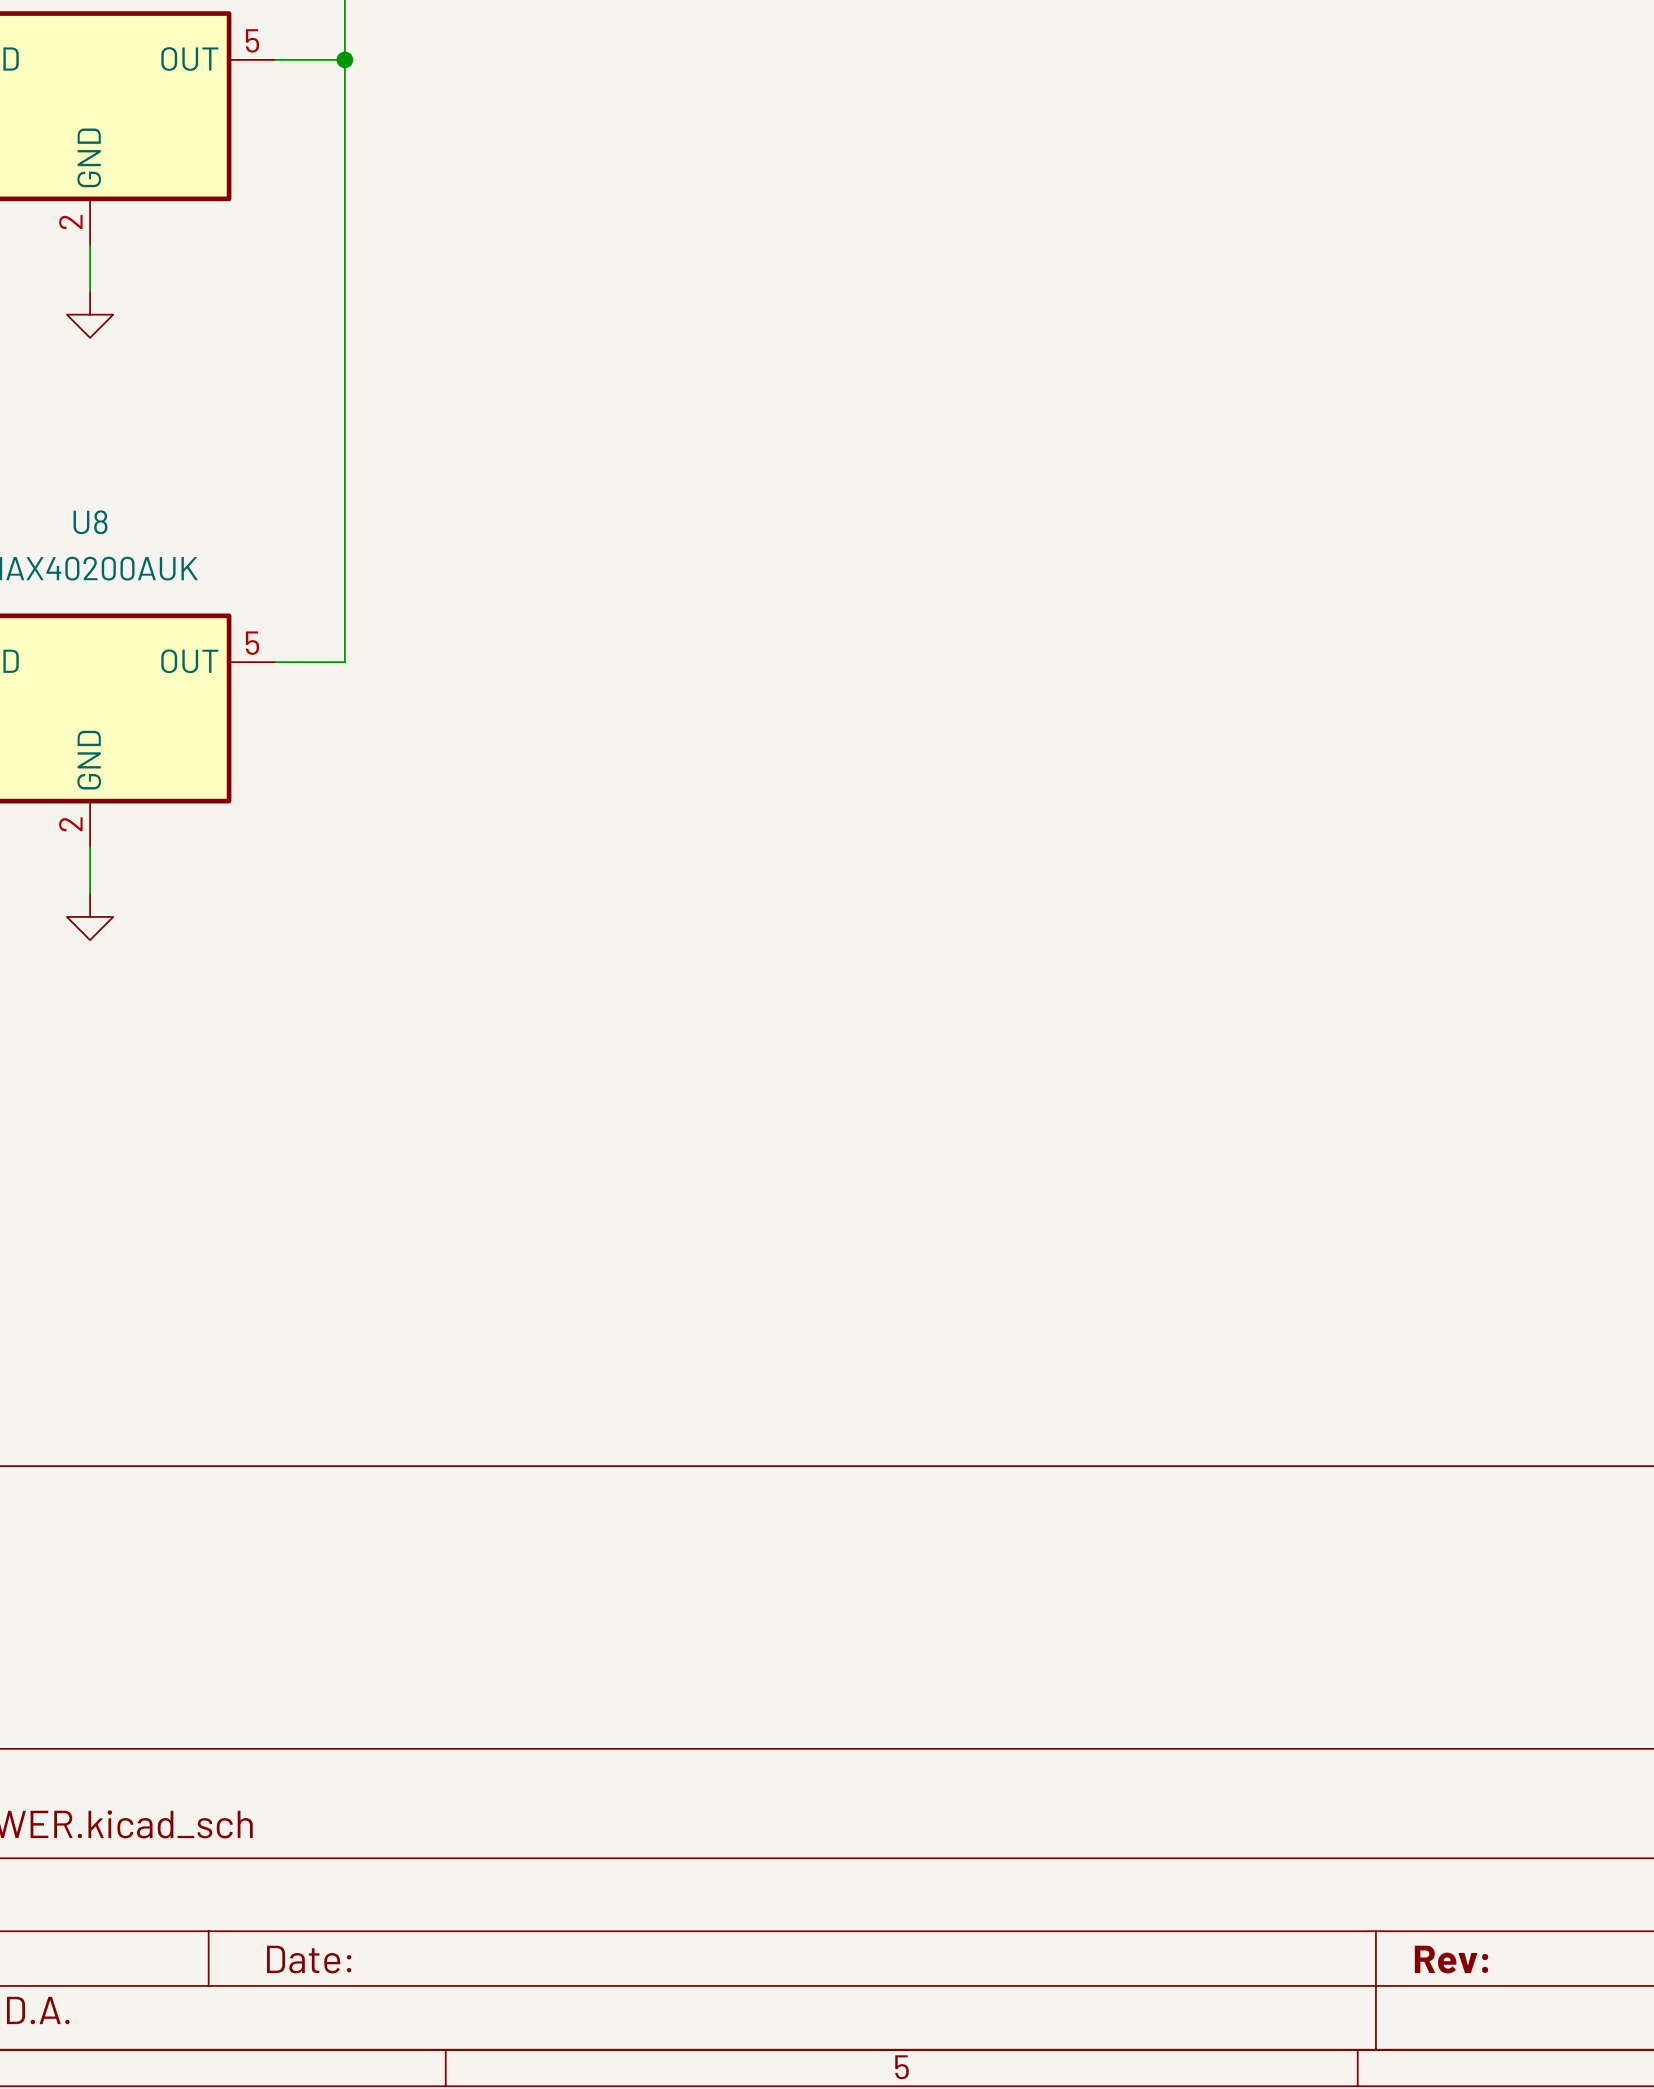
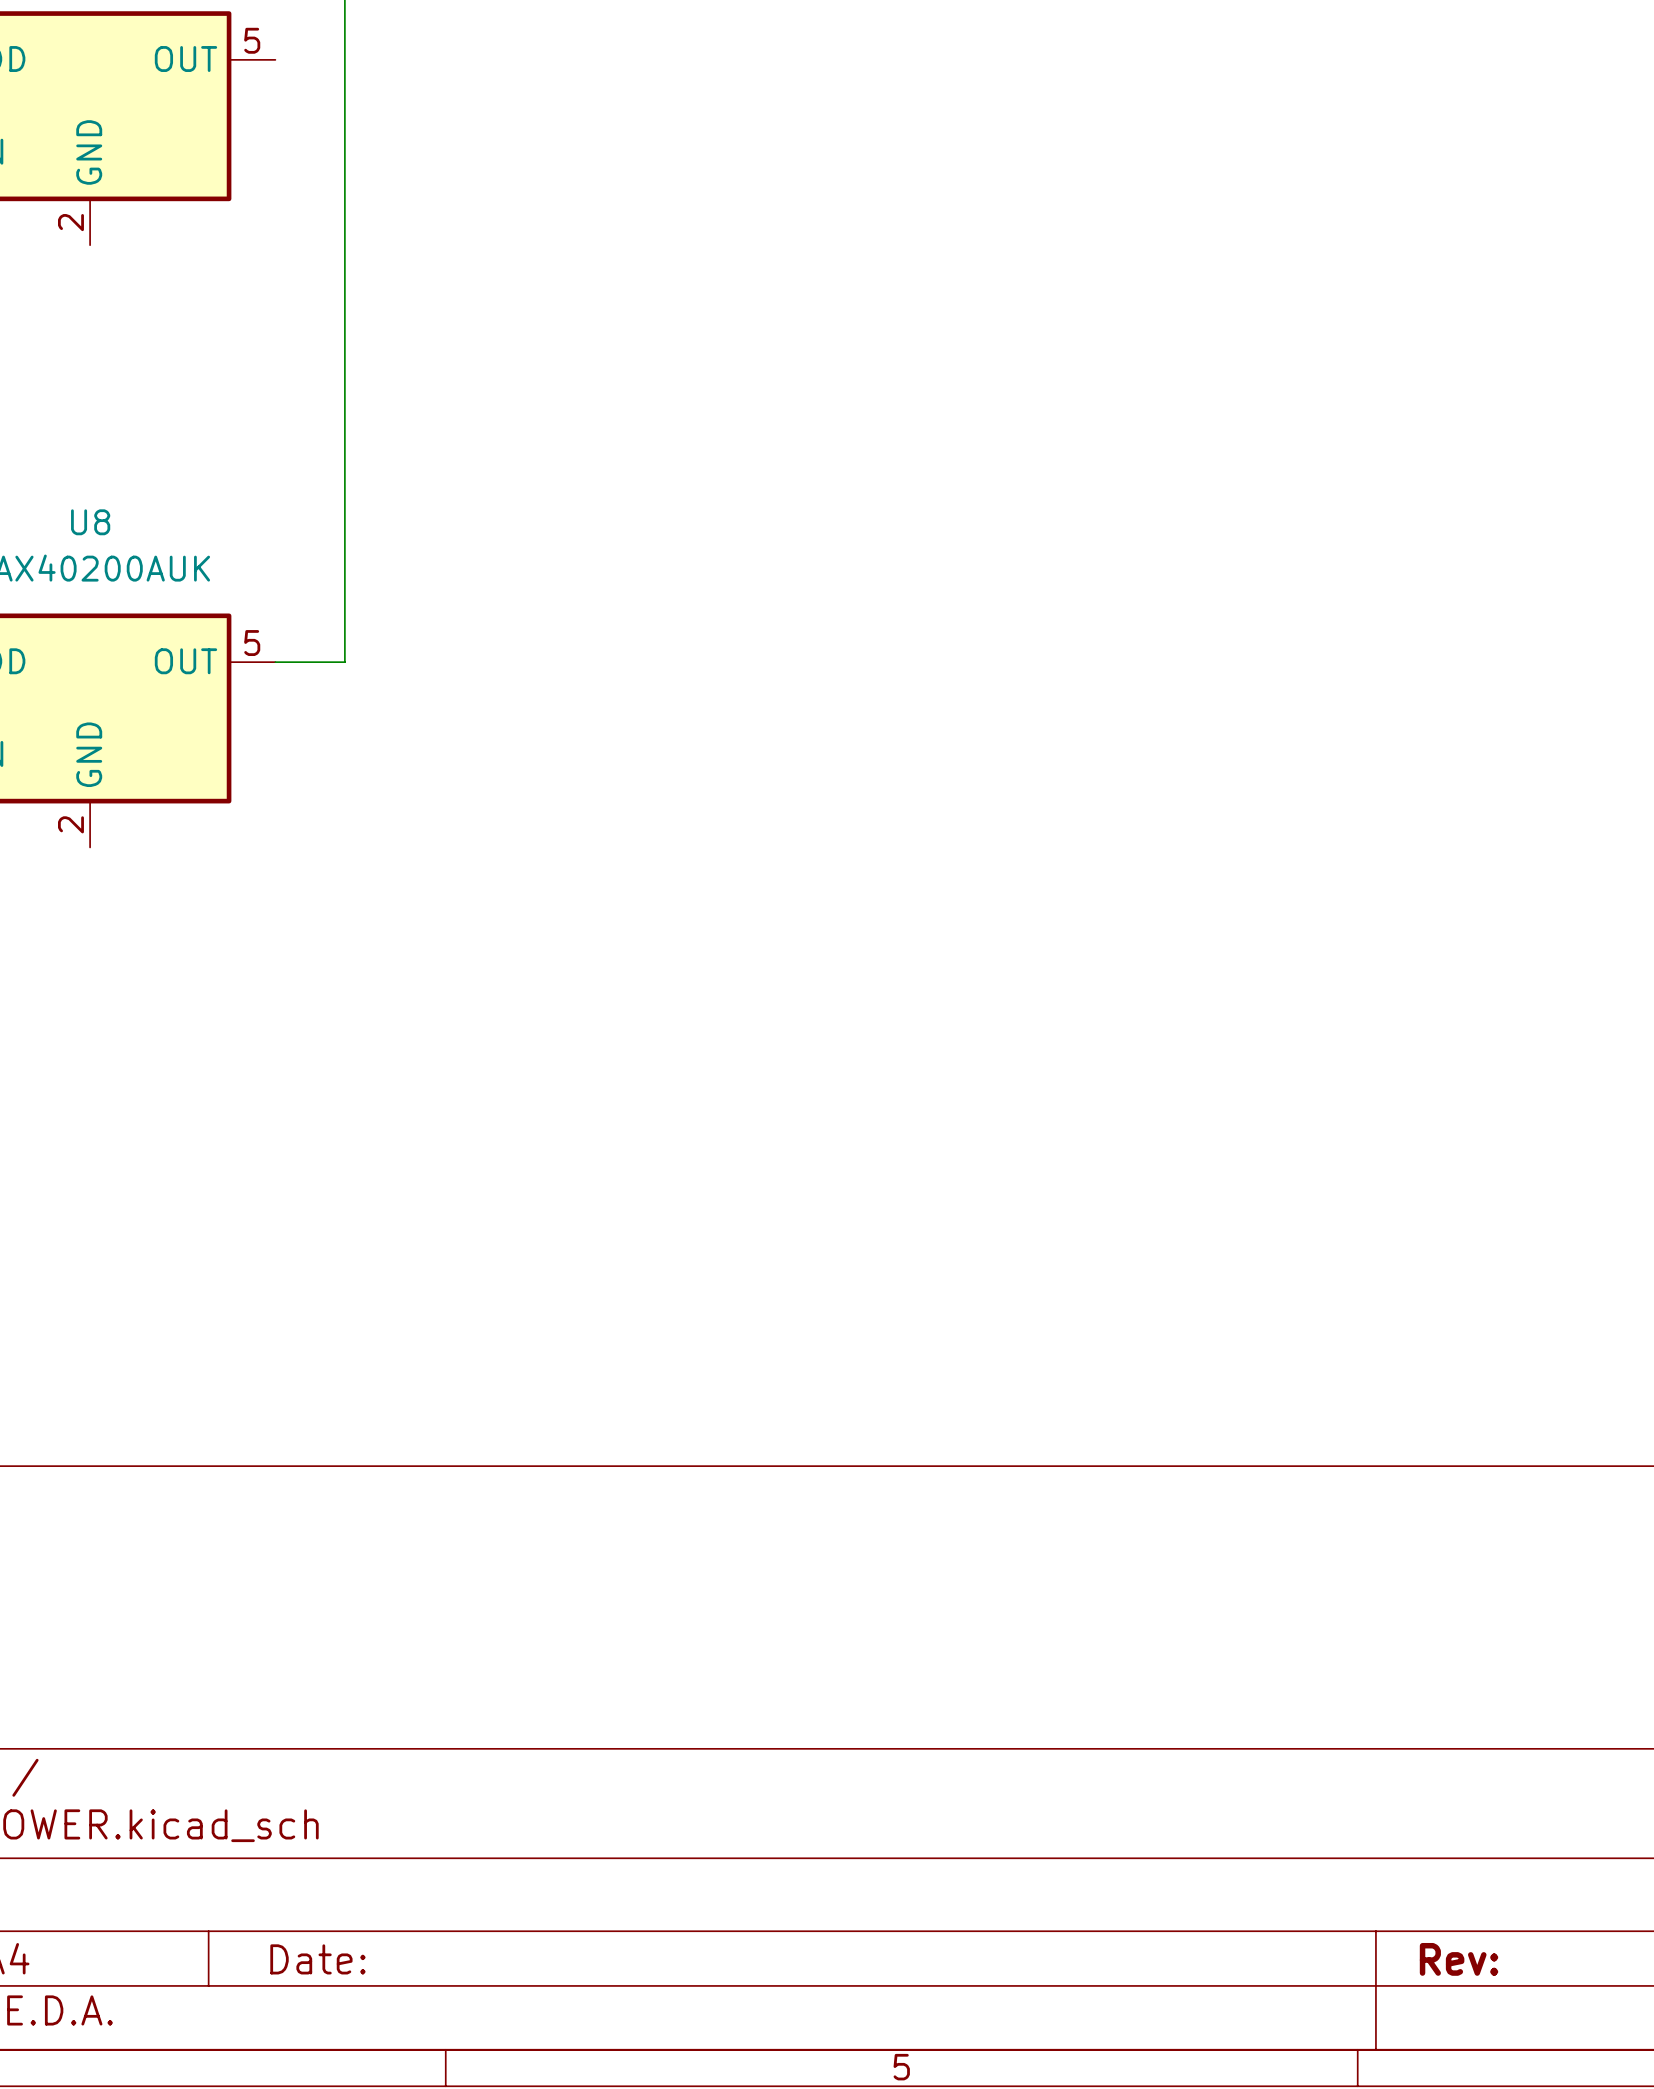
wire: (275, 59) (344, 59) -> none
junction: (344, 59) -> none
wire: (90, 245) (90, 291) -> none
power symbol: (90, 314) -> none
wire: (90, 847) (90, 893) -> none
power symbol: (90, 916) -> none

